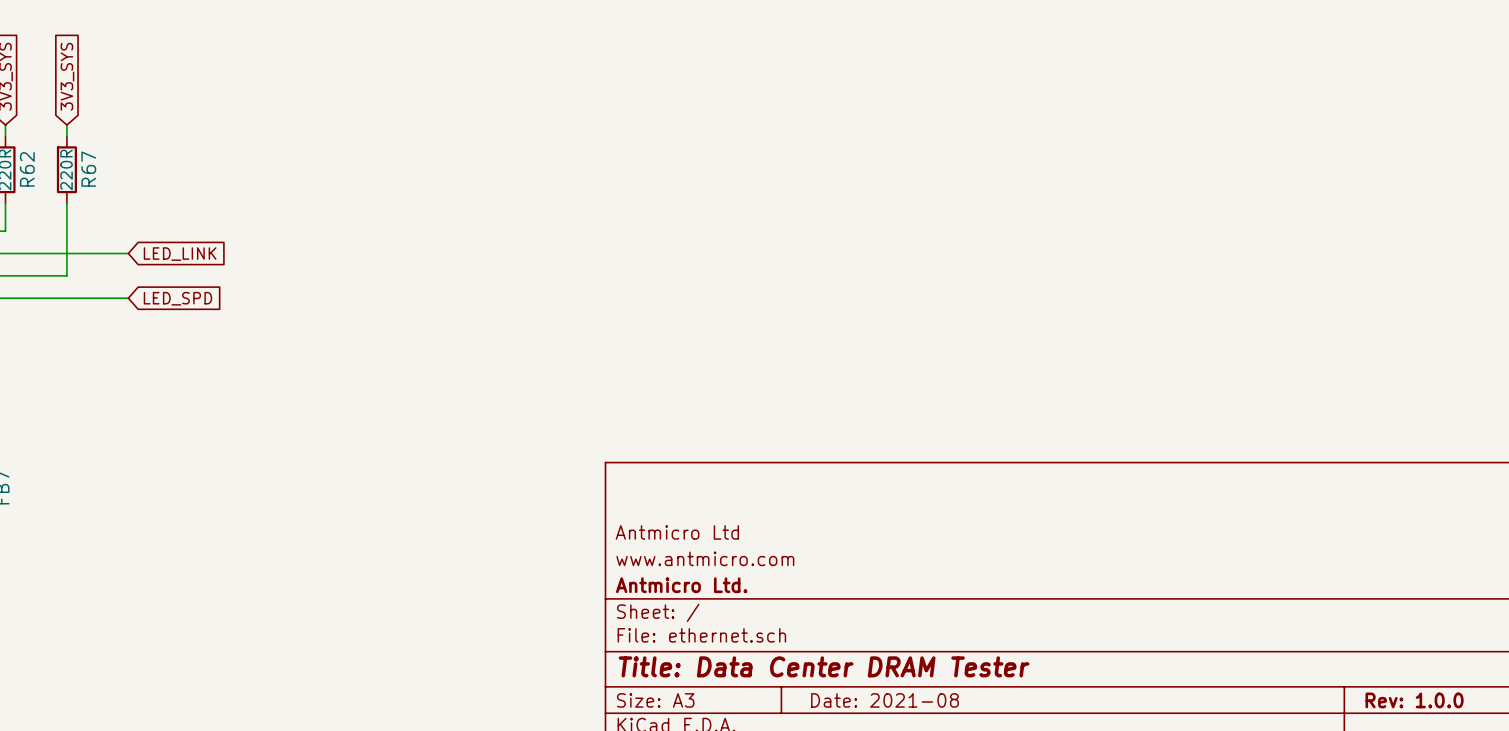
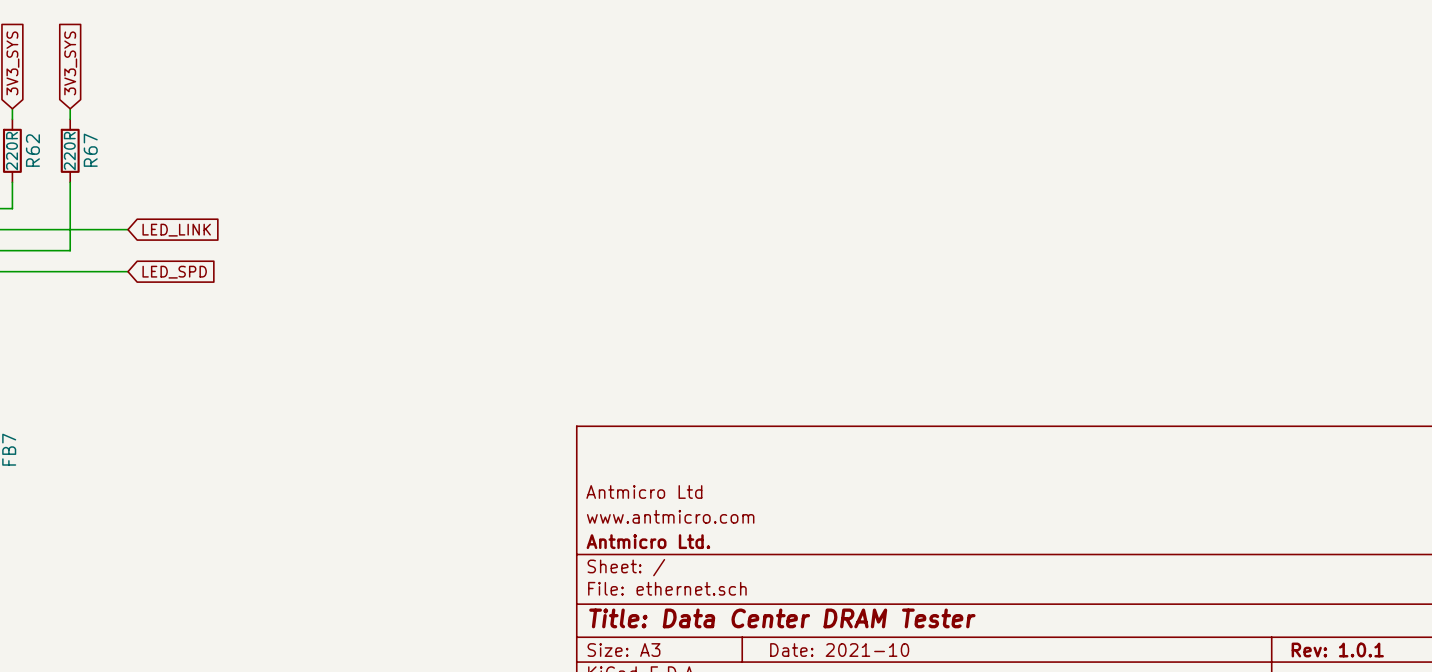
title block: Date: 2021-08 (885, 700) -> Date: 2021-10 (839, 650)
title block: Rev: 1.0.0 (1414, 700) -> Rev: 1.0.1 (1337, 650)

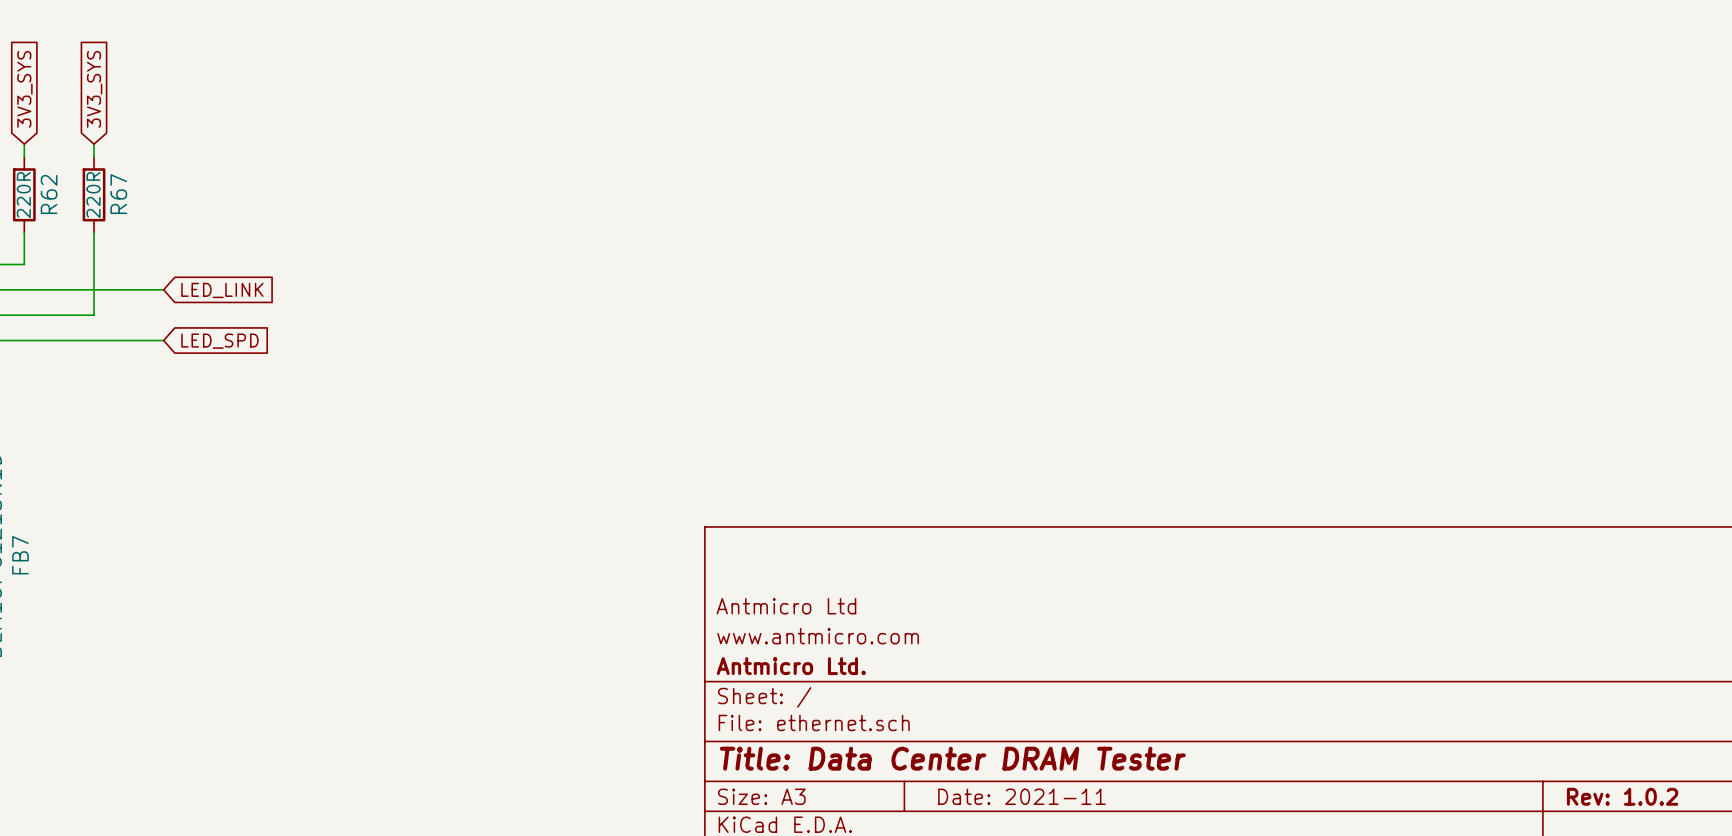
title block: Date: 2021-10 (839, 650) -> Date: 2021-11 (1021, 796)
title block: Rev: 1.0.1 (1337, 650) -> Rev: 1.0.2 (1622, 796)

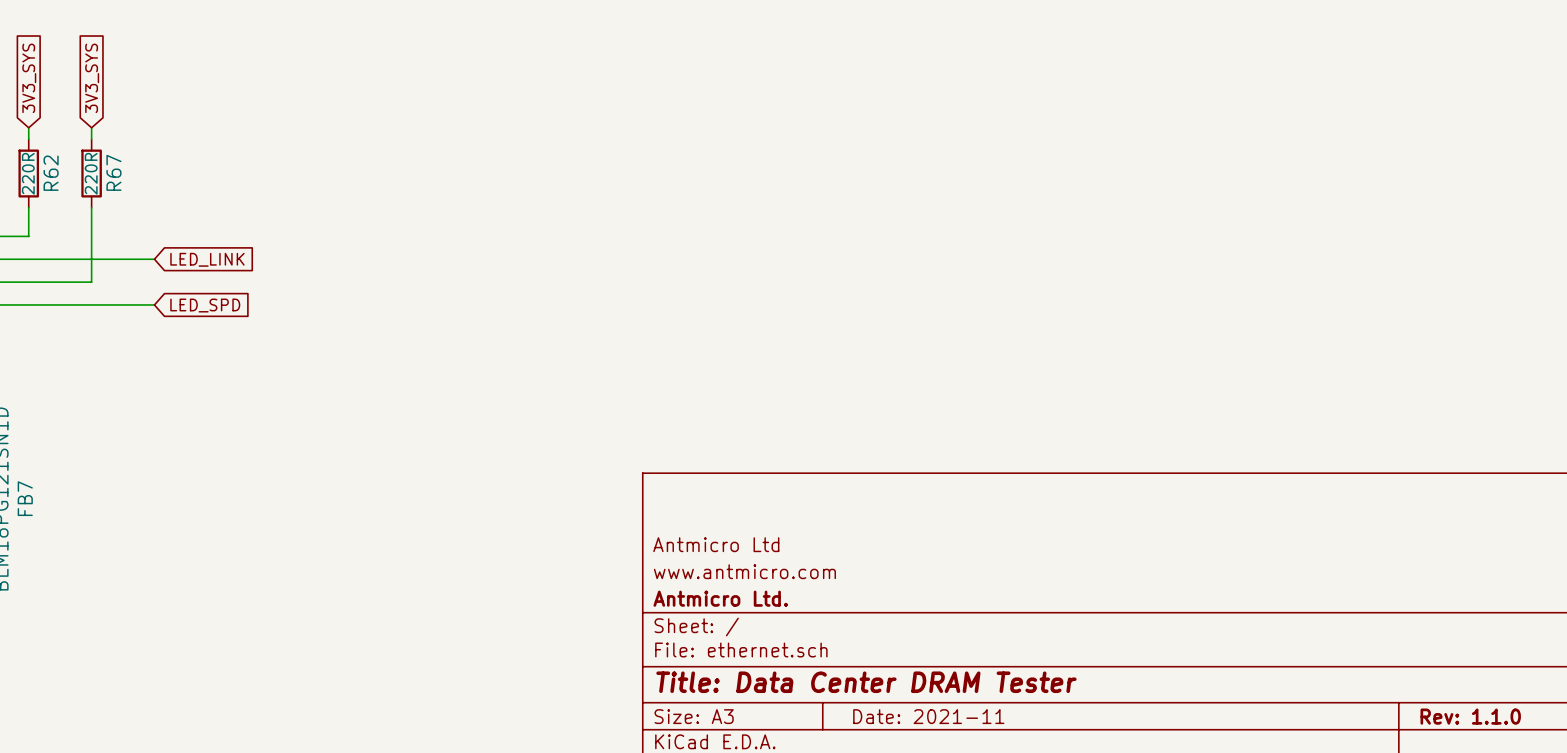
title block: Rev: 1.0.2 (1622, 796) -> Rev: 1.1.0 (1470, 716)

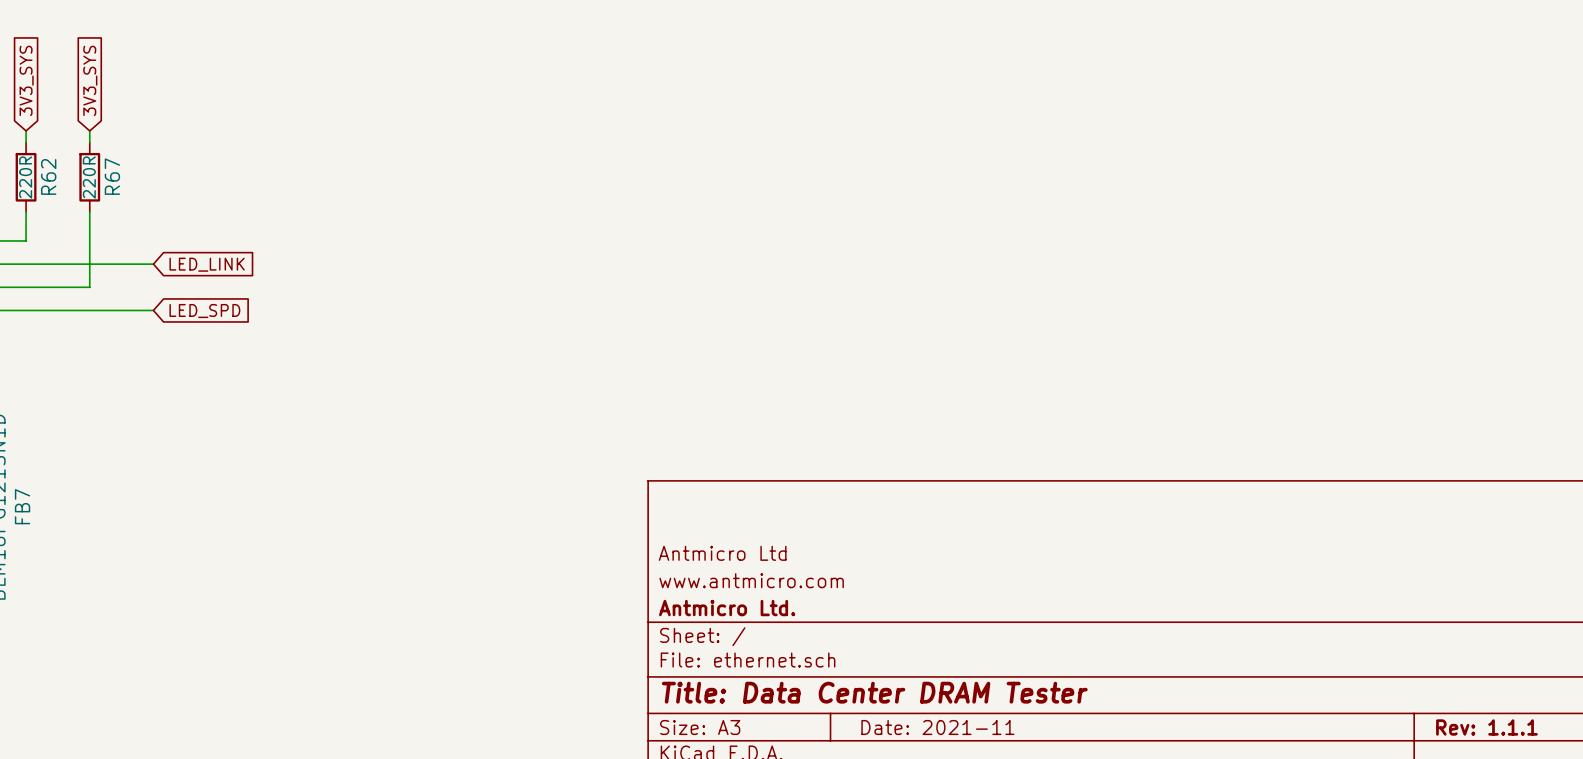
title block: Rev: 1.1.0 (1470, 716) -> Rev: 1.1.1 (1486, 727)

